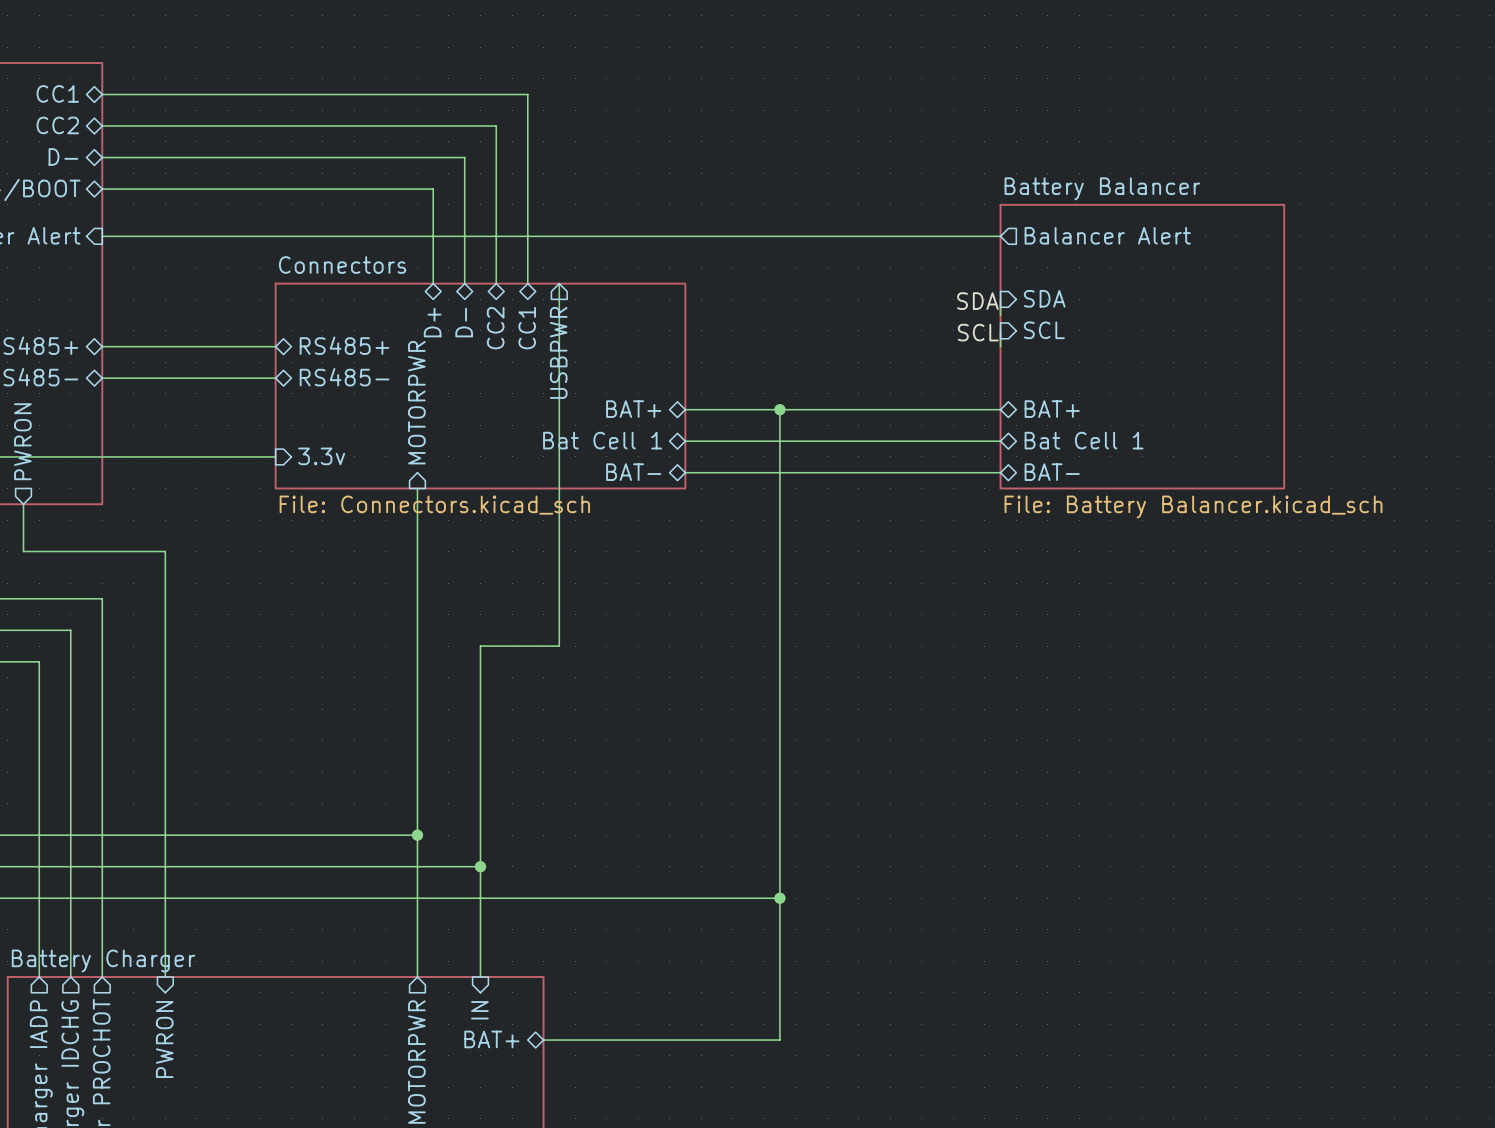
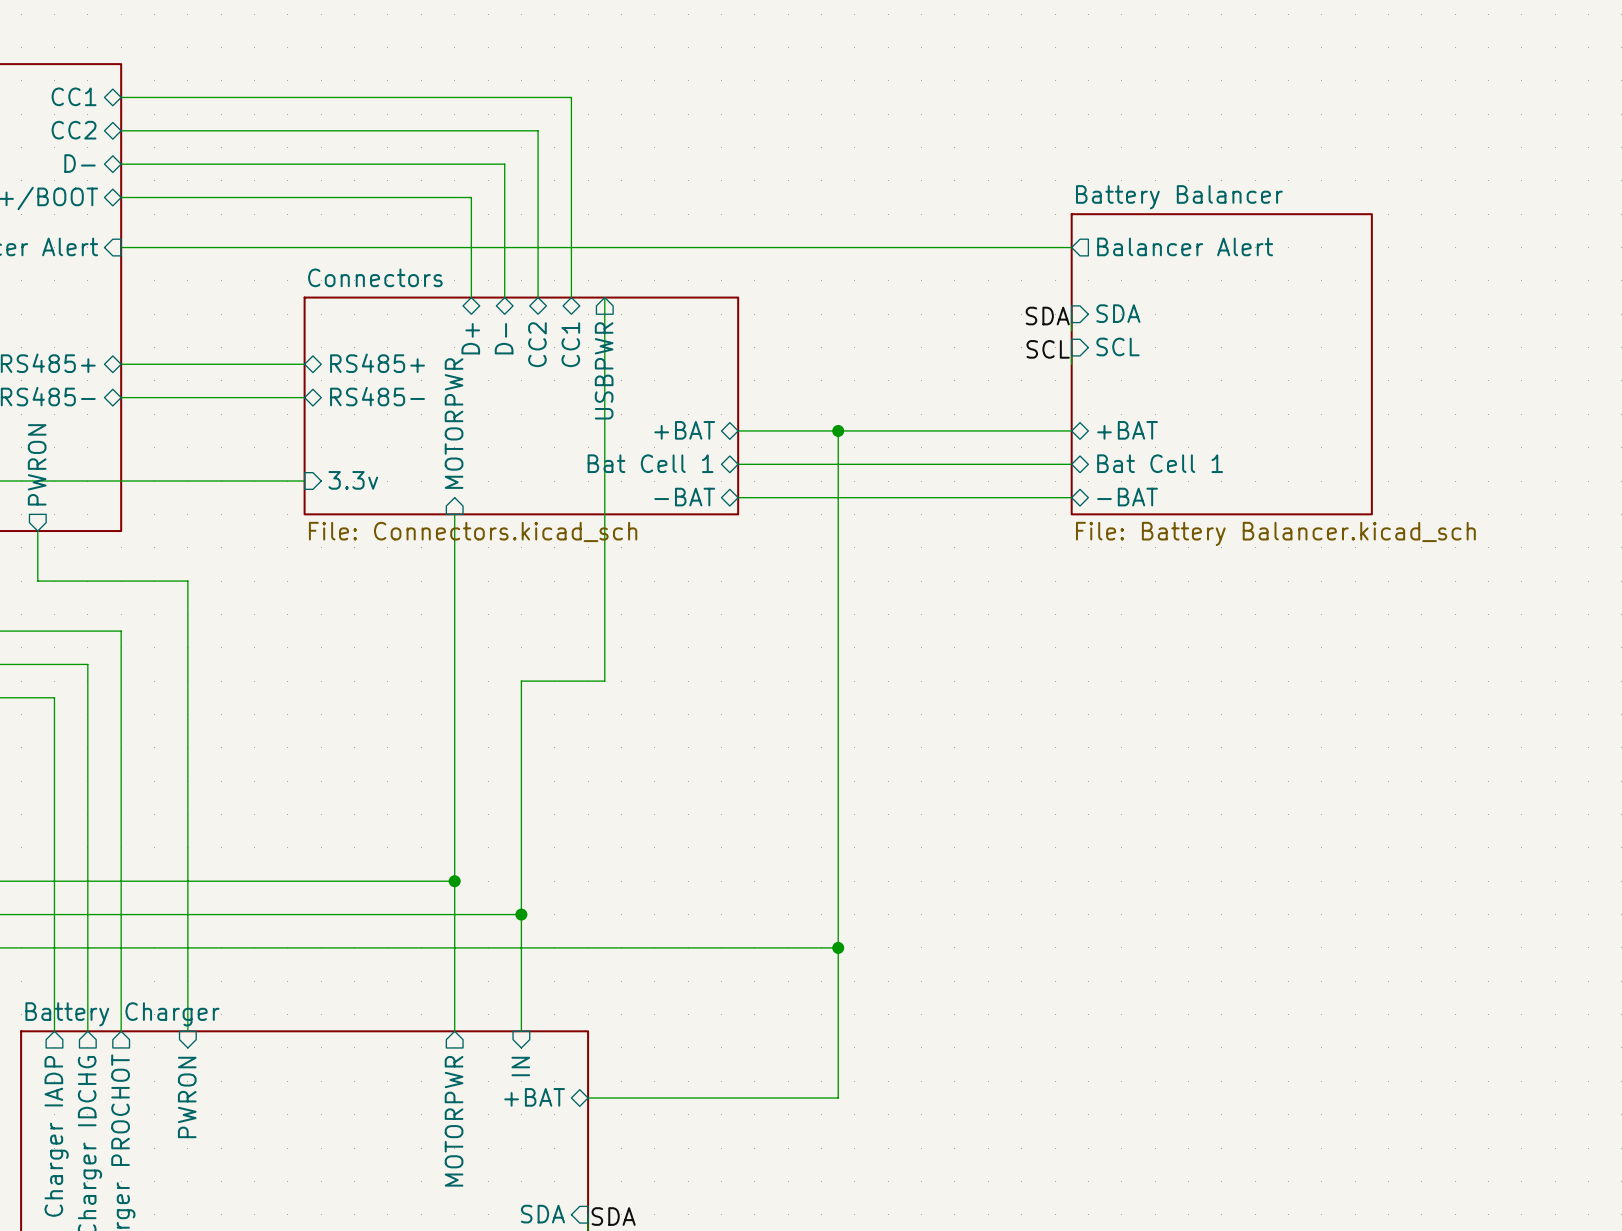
sheet pin: BAT+ (633, 409) -> +BAT (684, 430)
sheet pin: BAT+ (1052, 409) -> +BAT (1127, 430)
sheet pin: BAT- (633, 472) -> -BAT (684, 497)
sheet pin: BAT- (1052, 472) -> -BAT (1127, 497)
sheet pin: BAT+ (491, 1039) -> +BAT (534, 1097)

